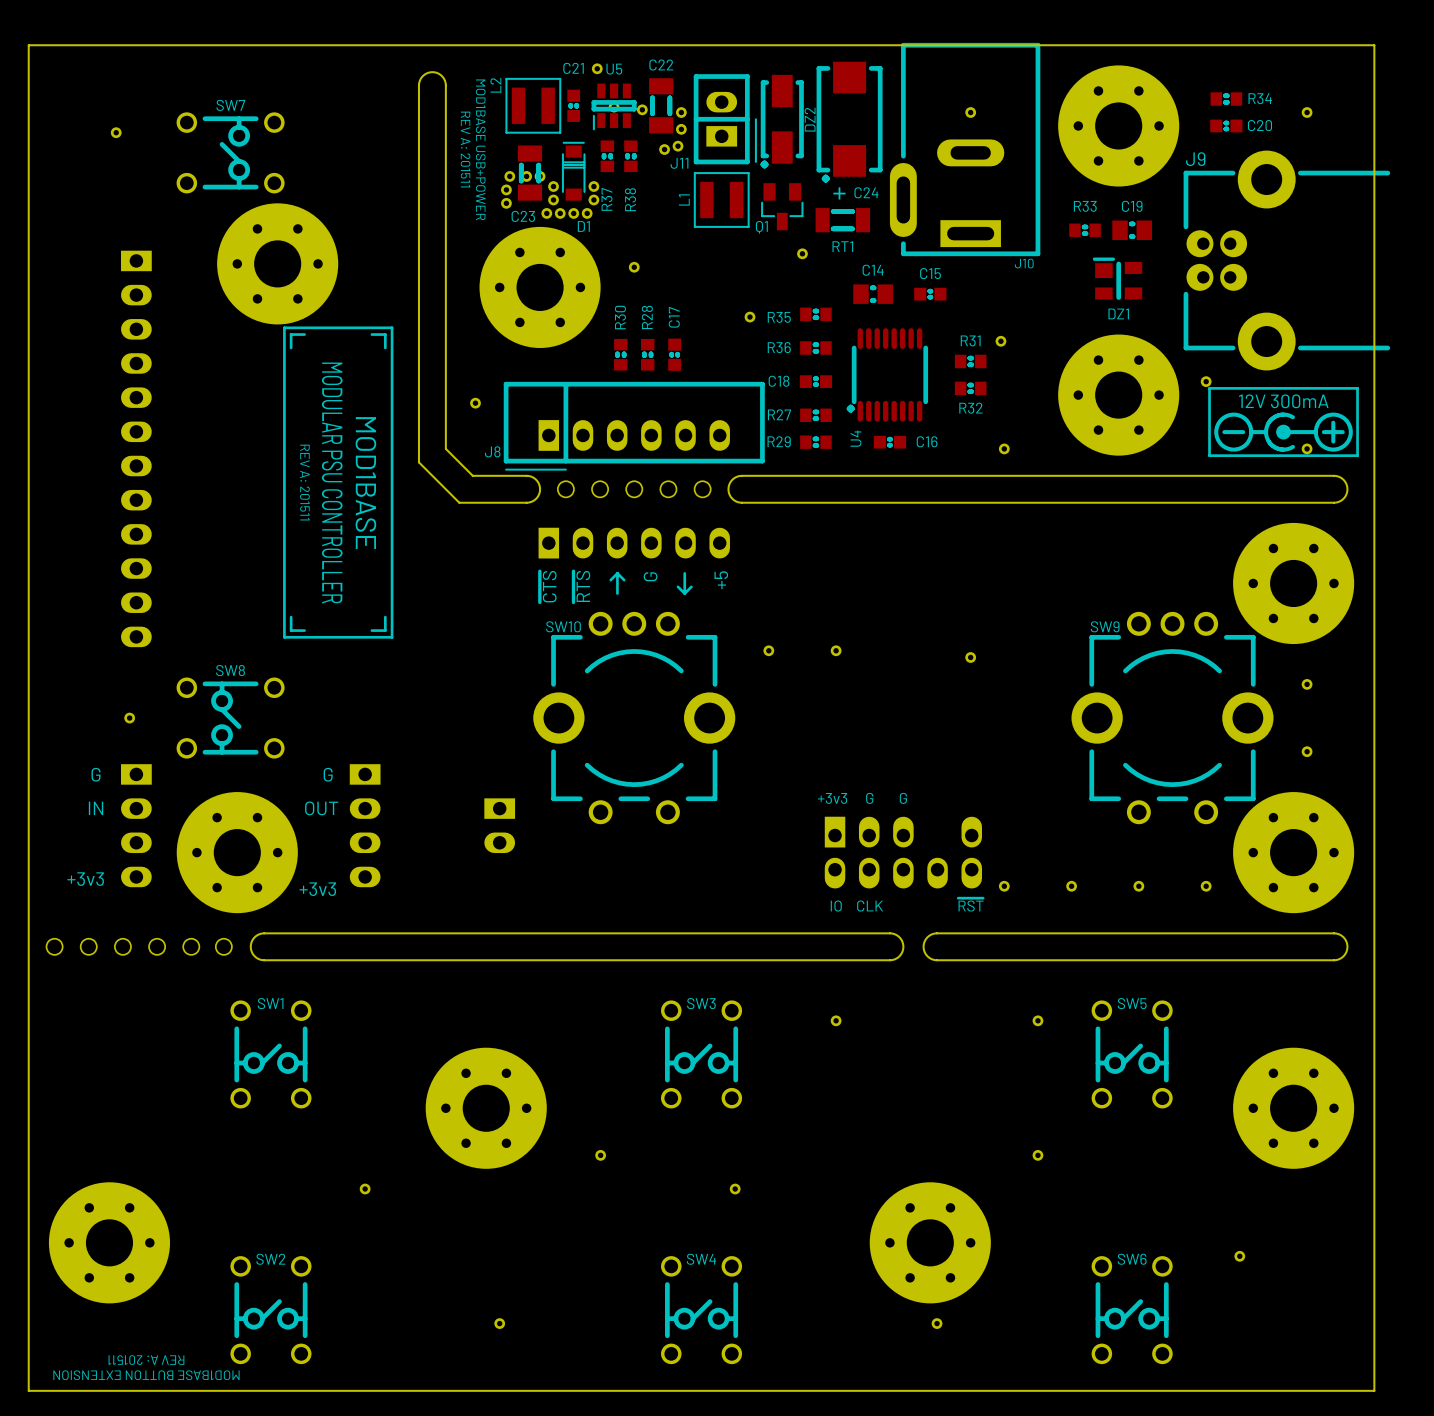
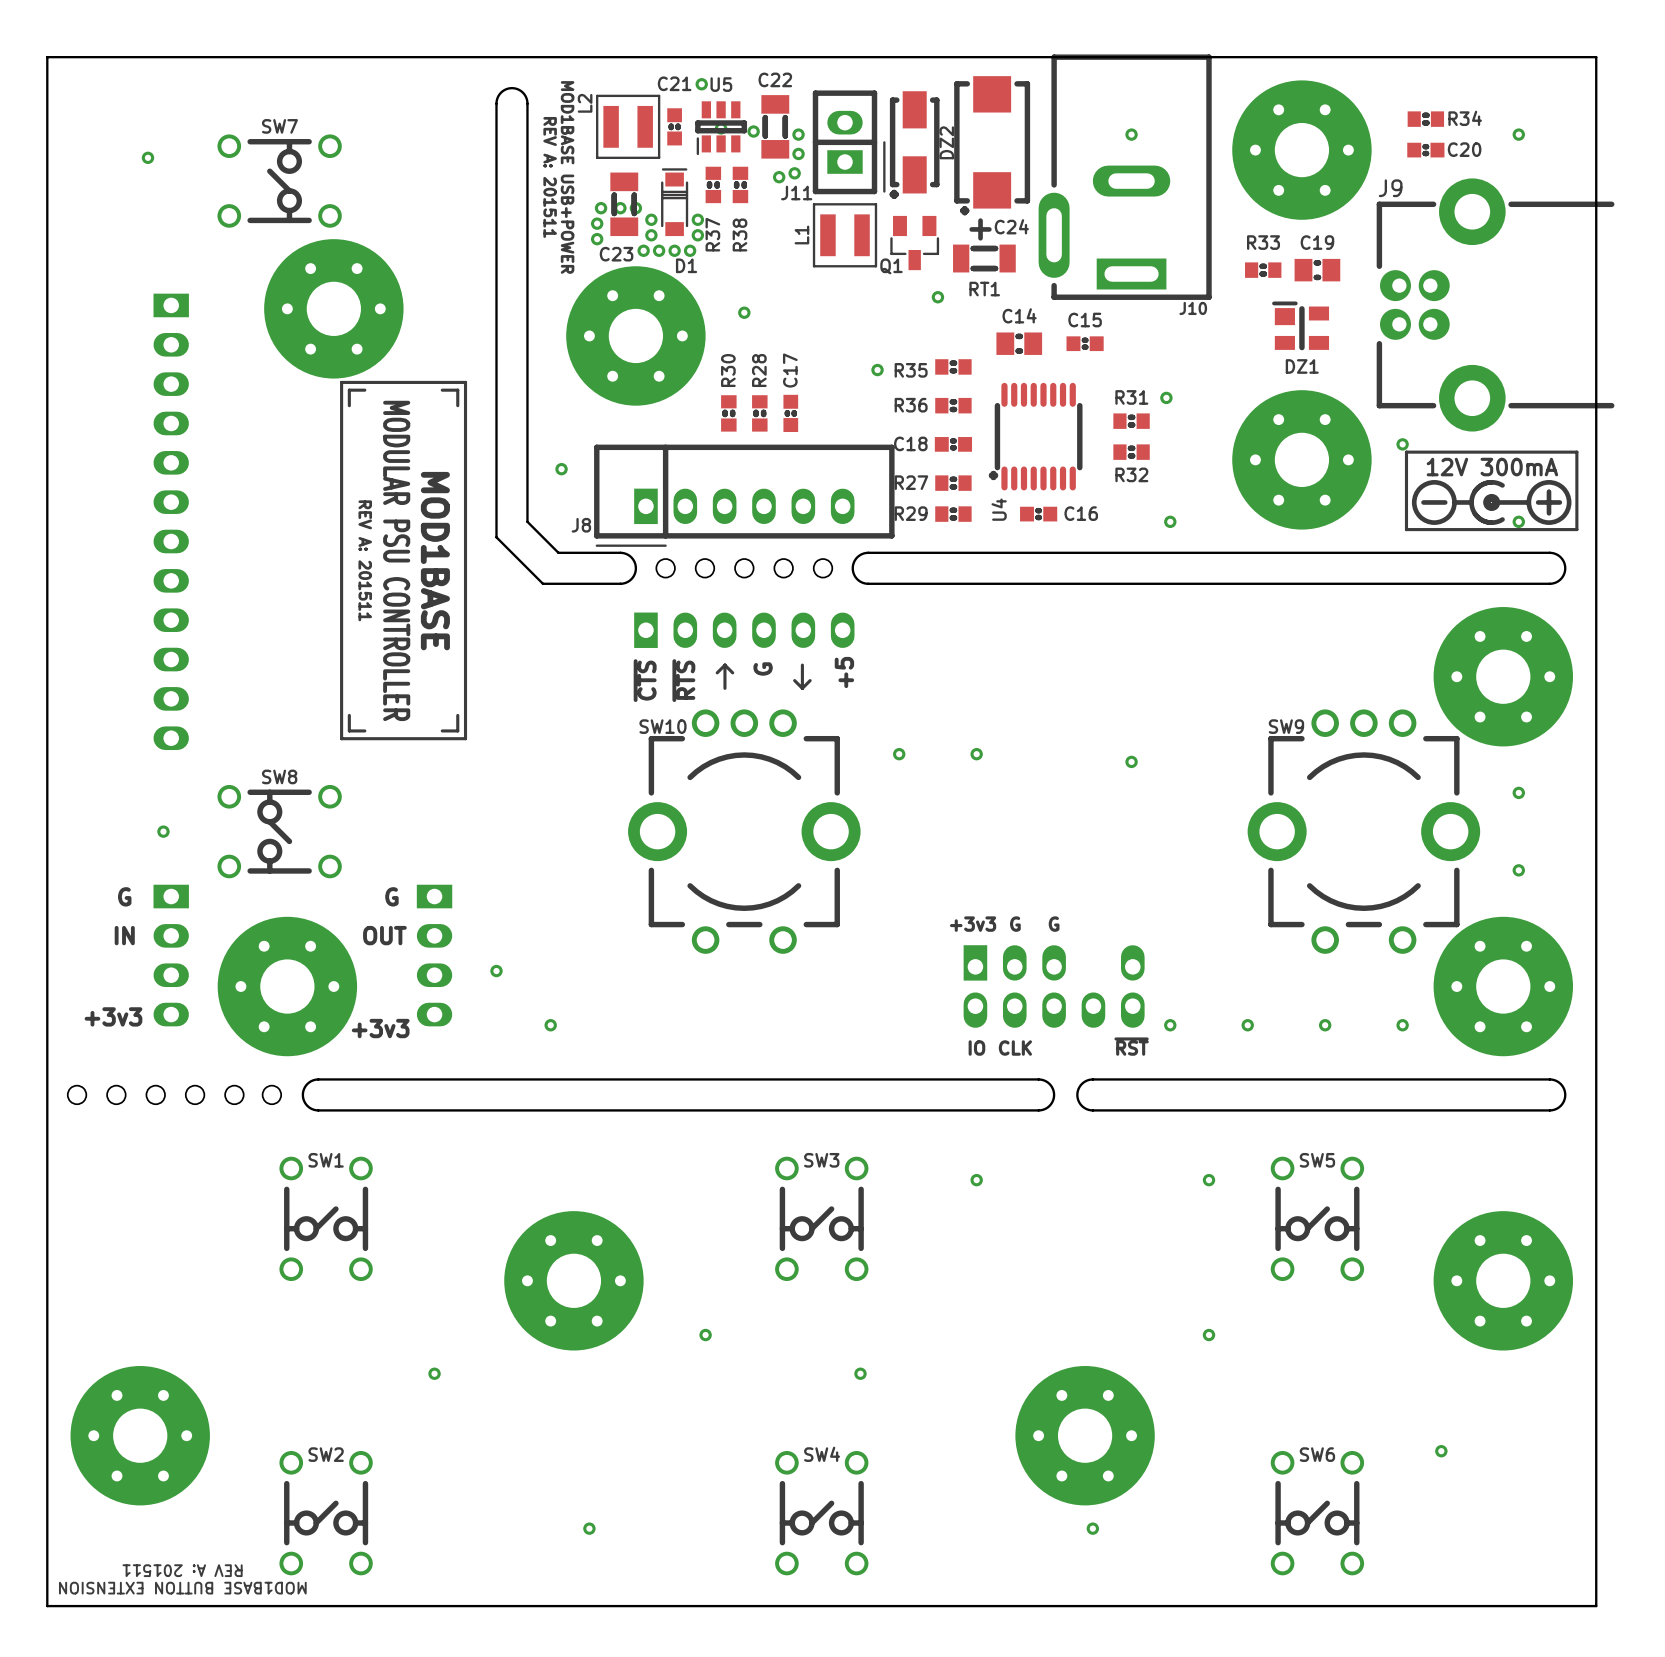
part: (499, 825) -> none
part: none -> (496, 971)
part: none -> (550, 1025)

